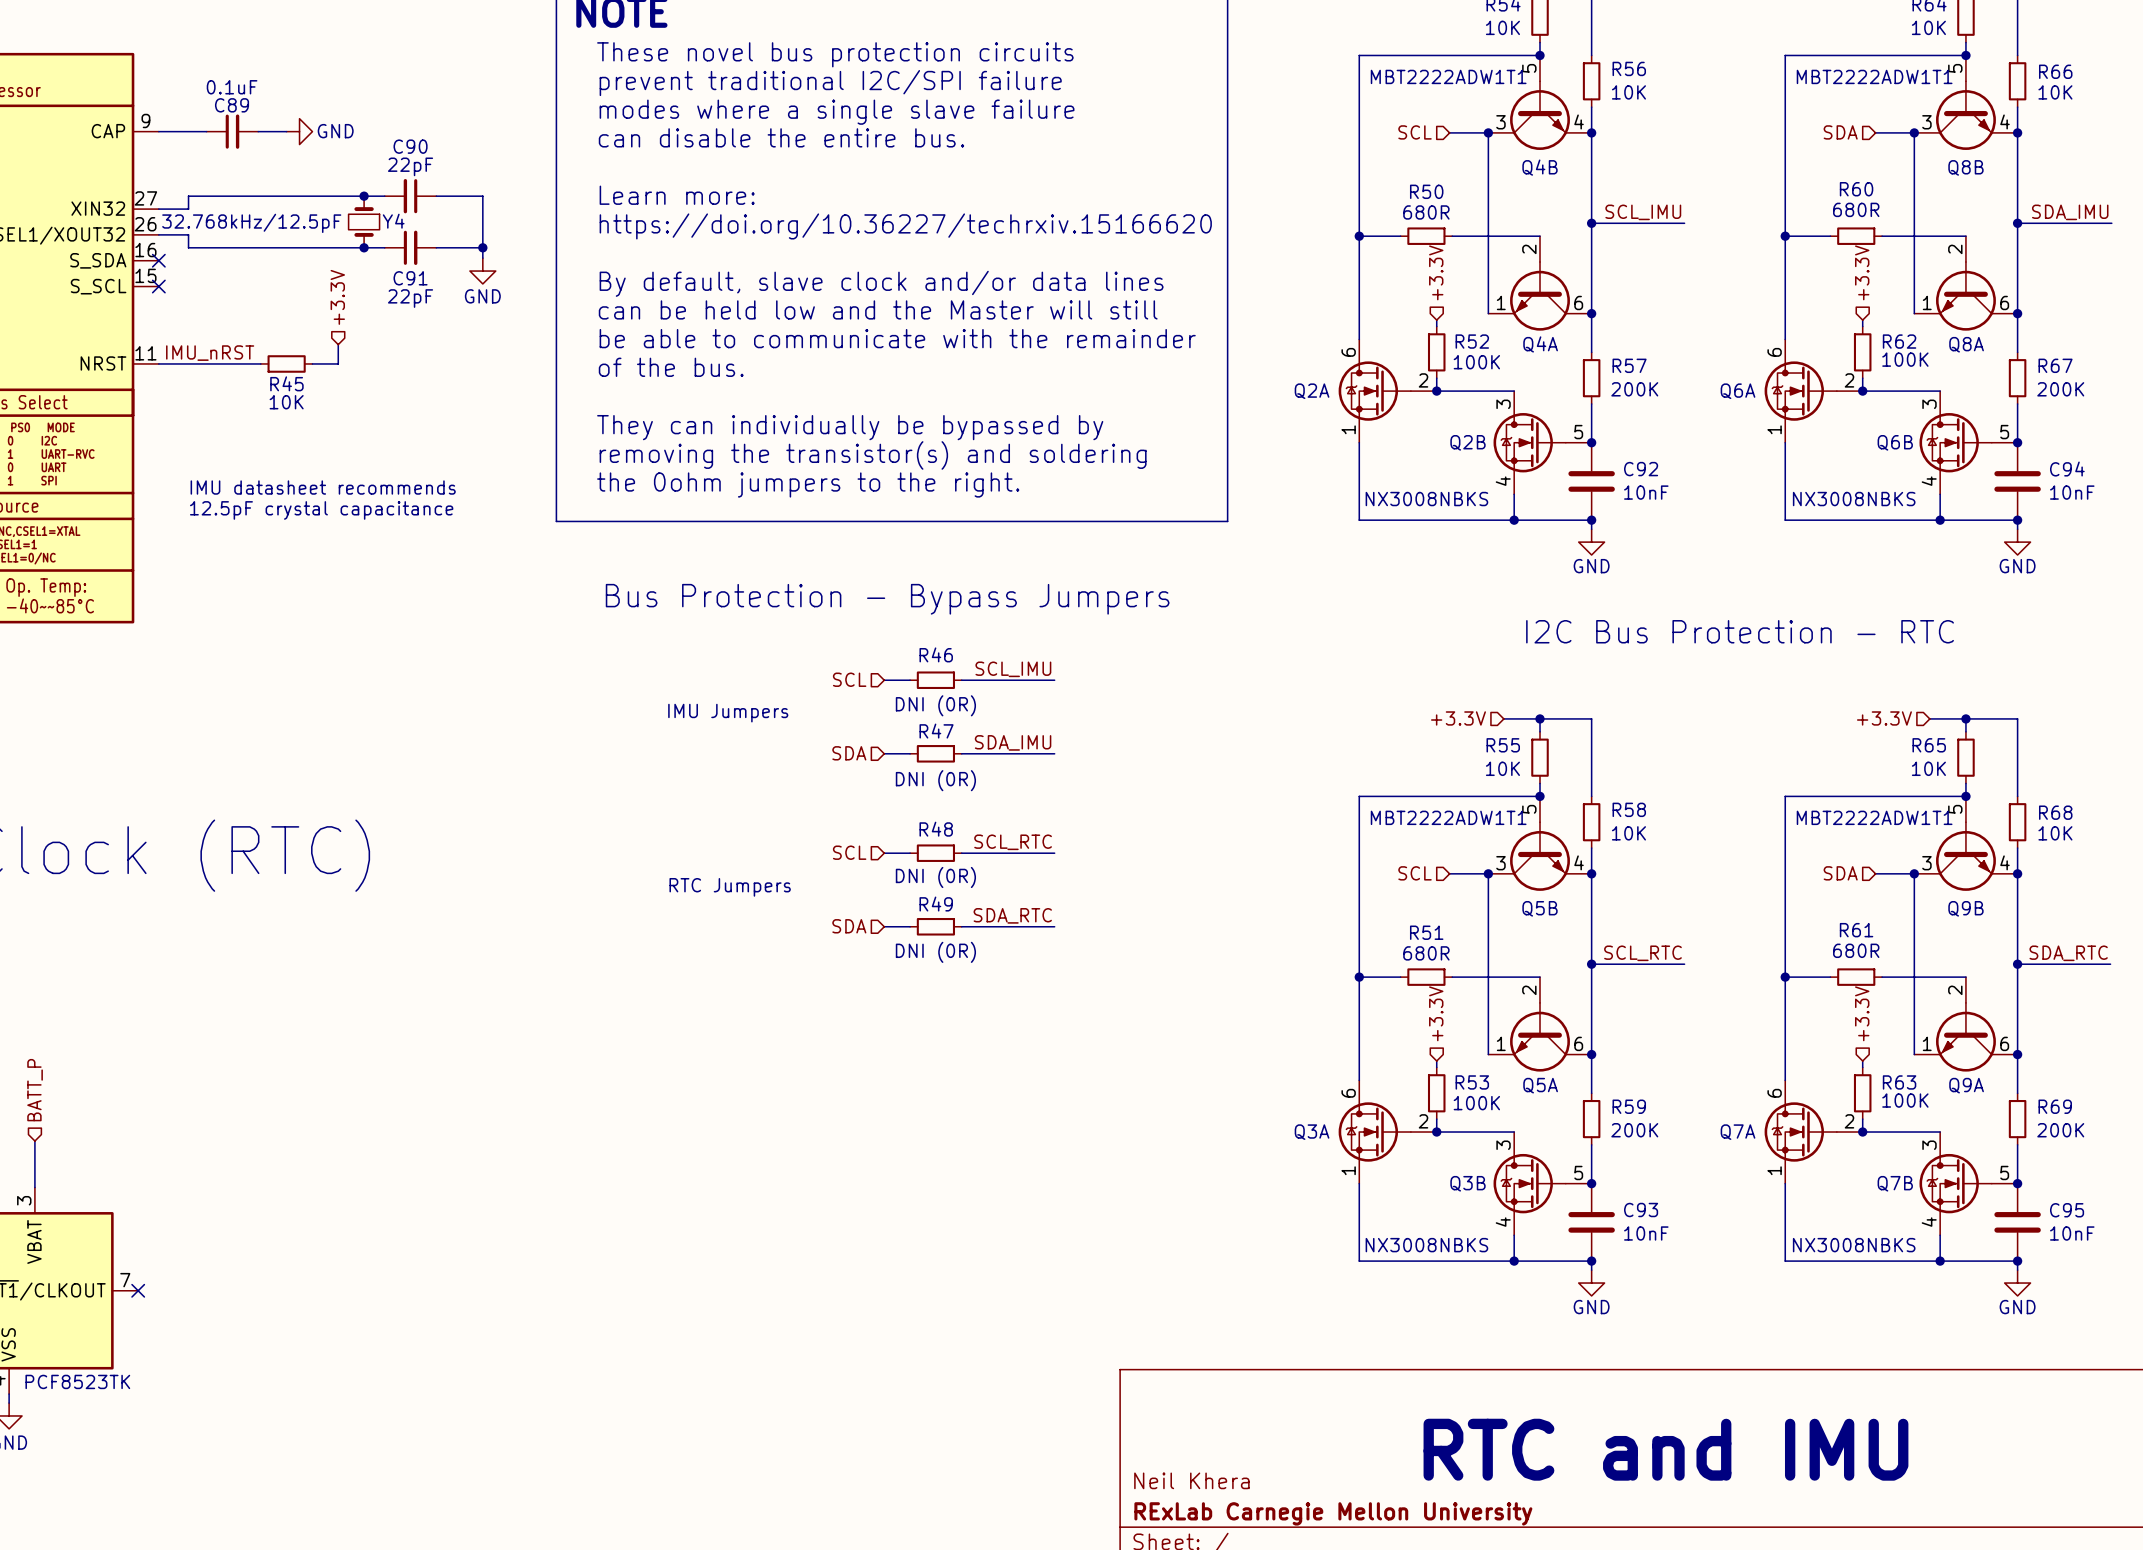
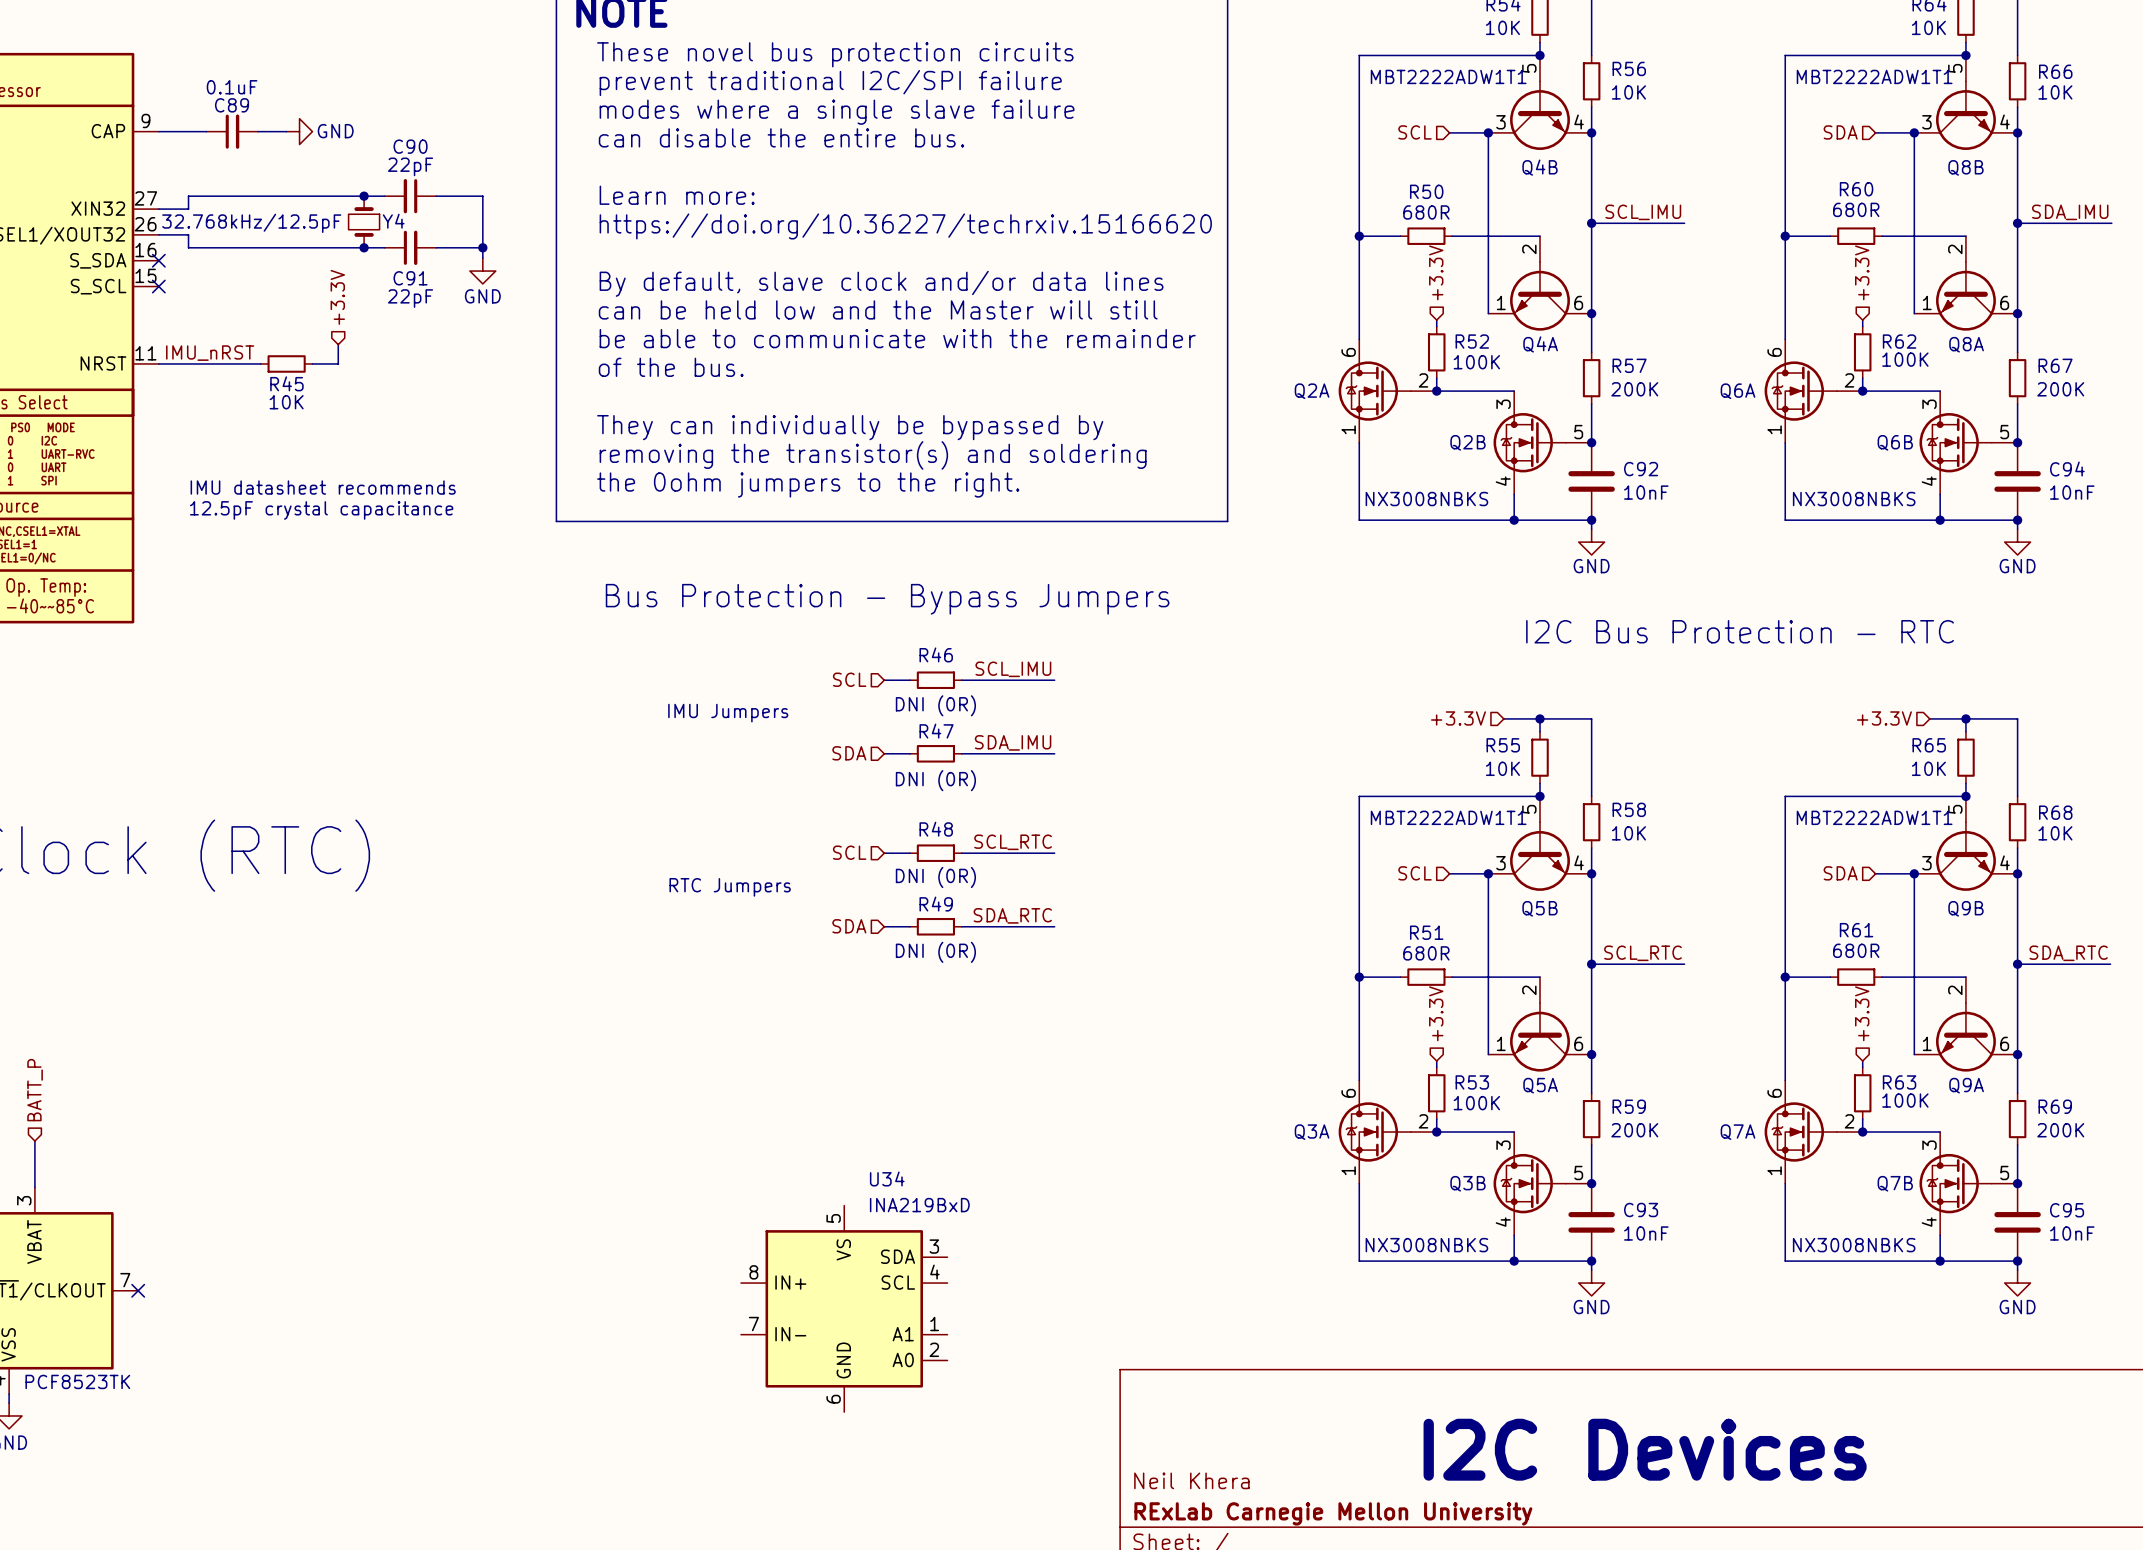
U34: none -> INA219BxD (844, 1308)
text: RTC and IMU (1665, 1449) -> I2C Devices (1645, 1449)

